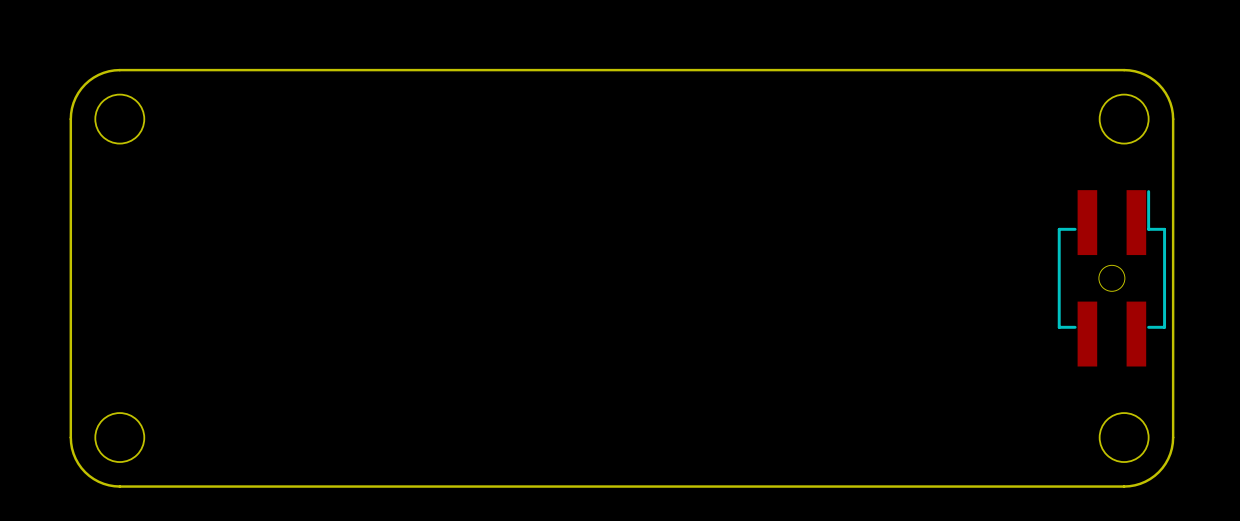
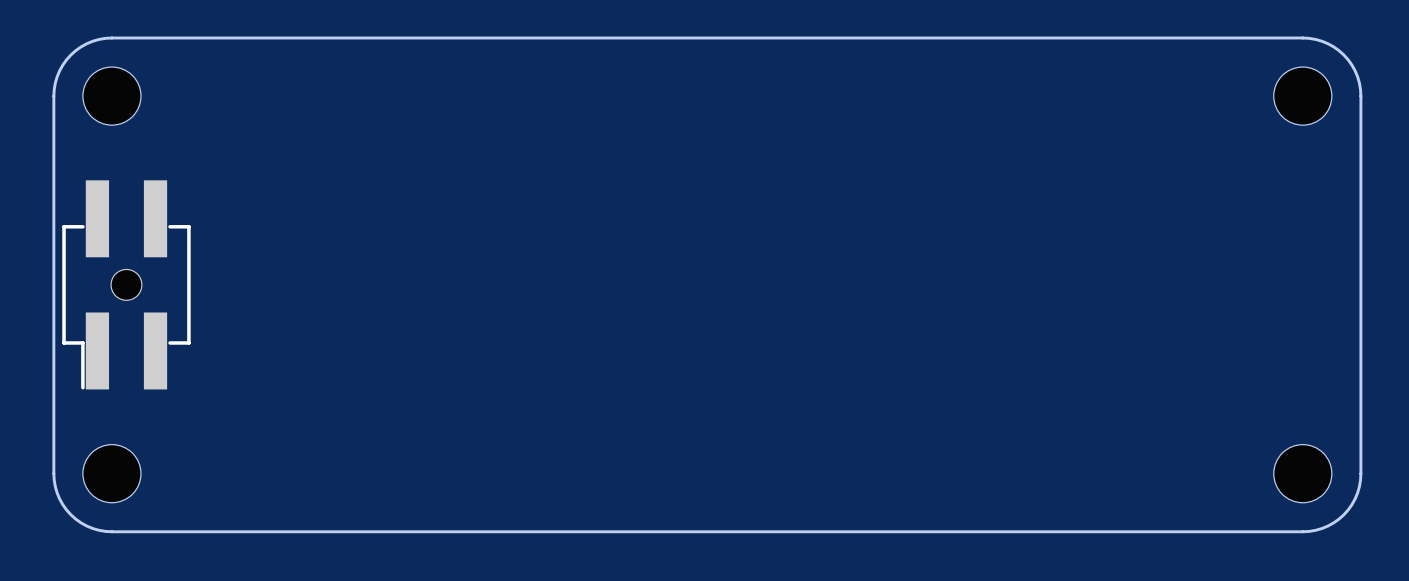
part: none -> (126, 284)
part: (1111, 278) -> none

